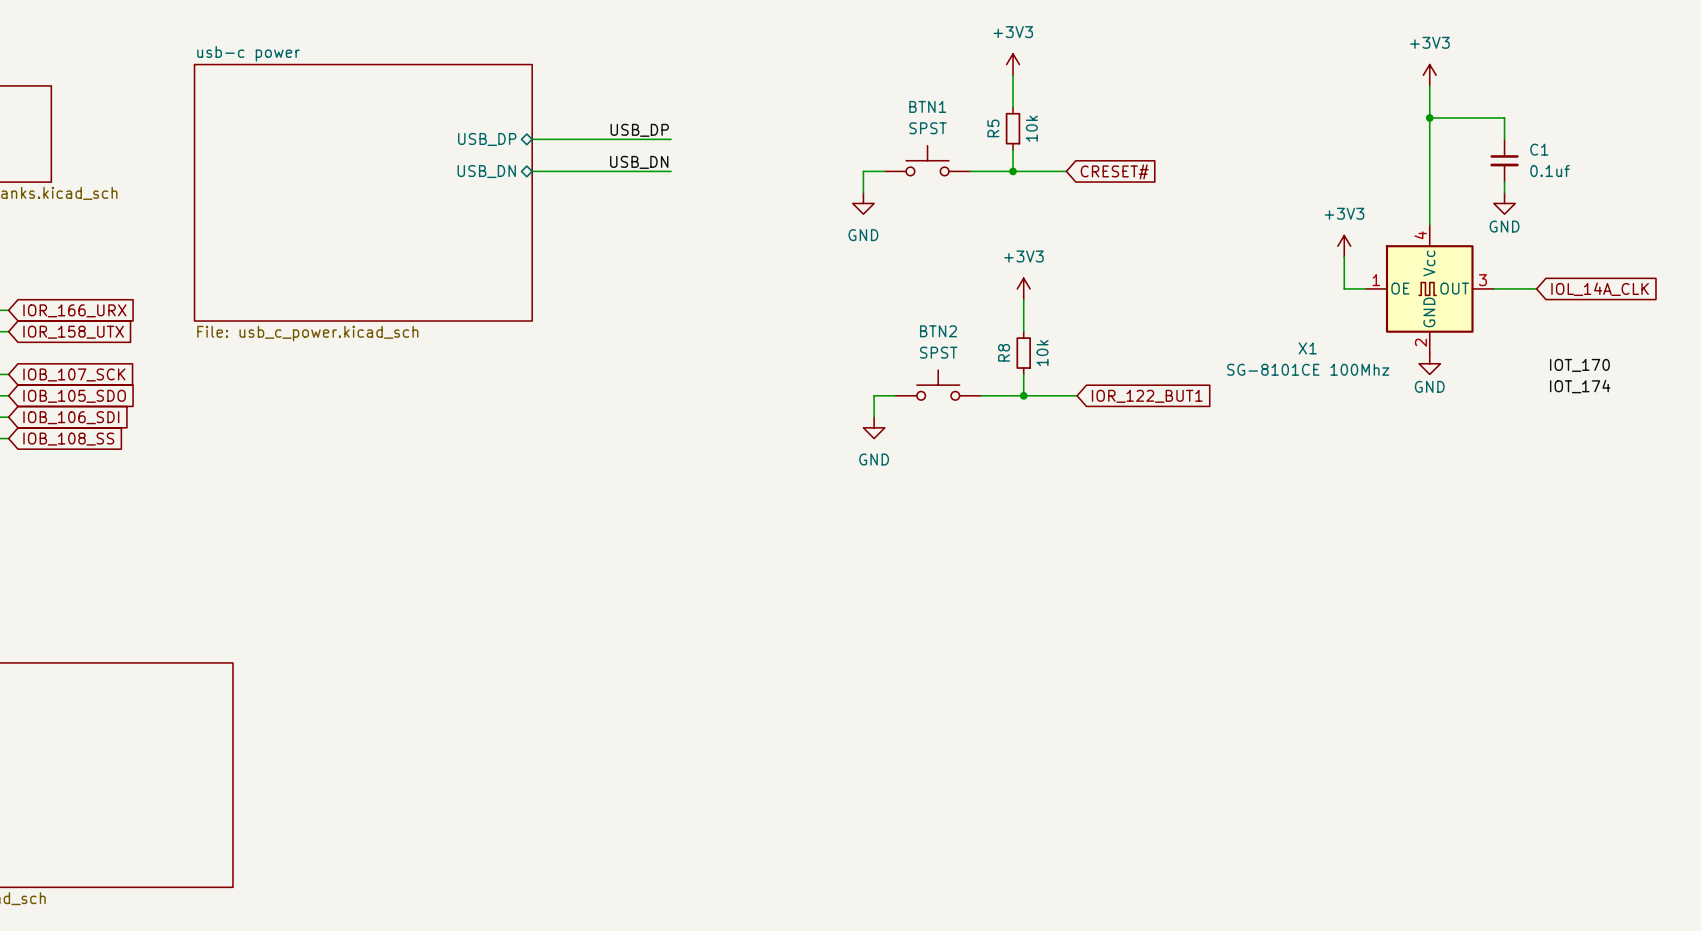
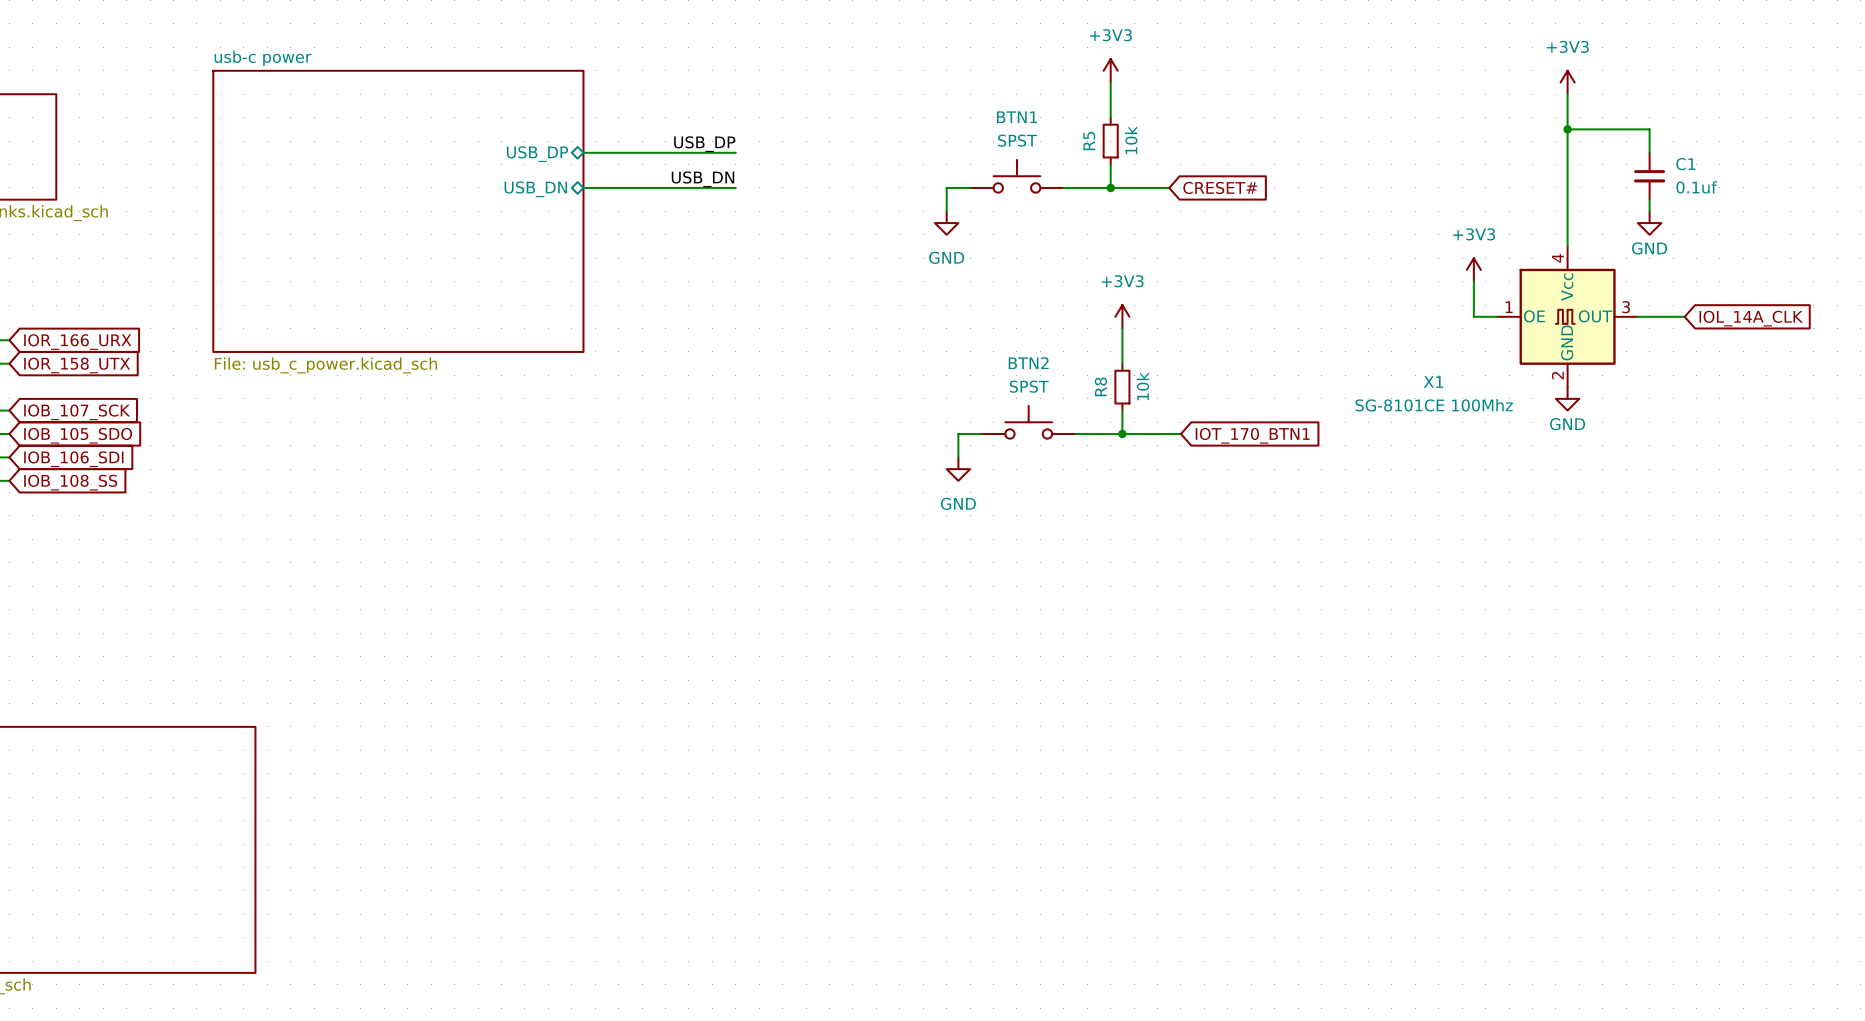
label: IOT_170 (1579, 365) -> none
label: IOT_174 (1580, 386) -> none
global label: IOR_122_BUT1 (1147, 396) -> IOT_170_BTN1 (1252, 435)

